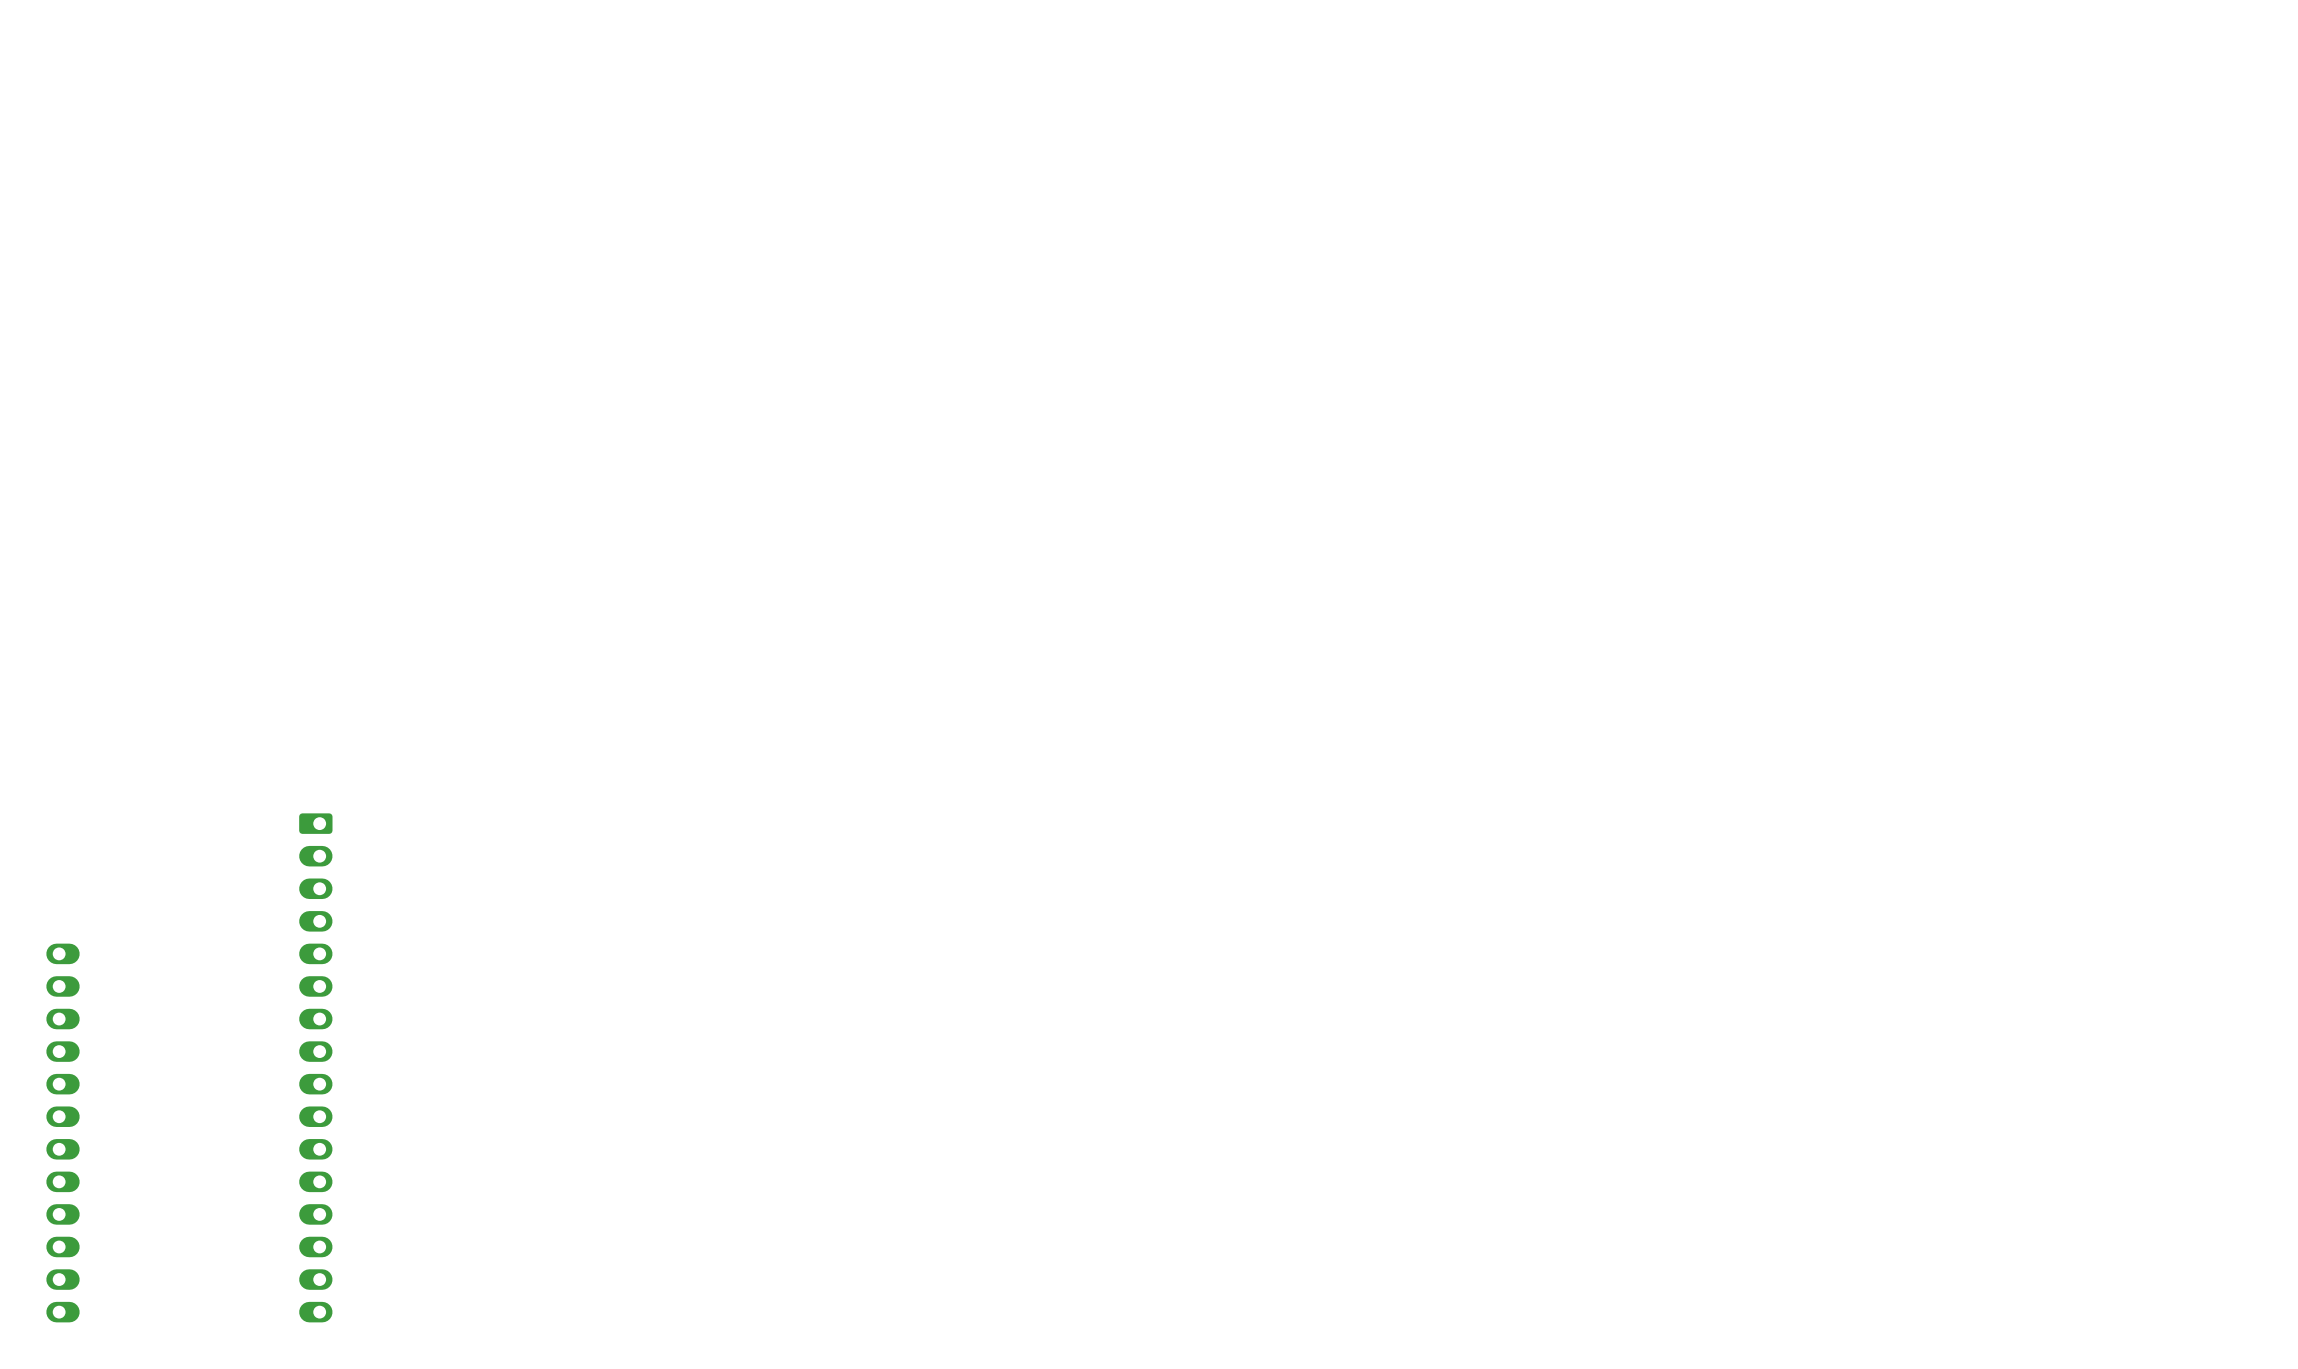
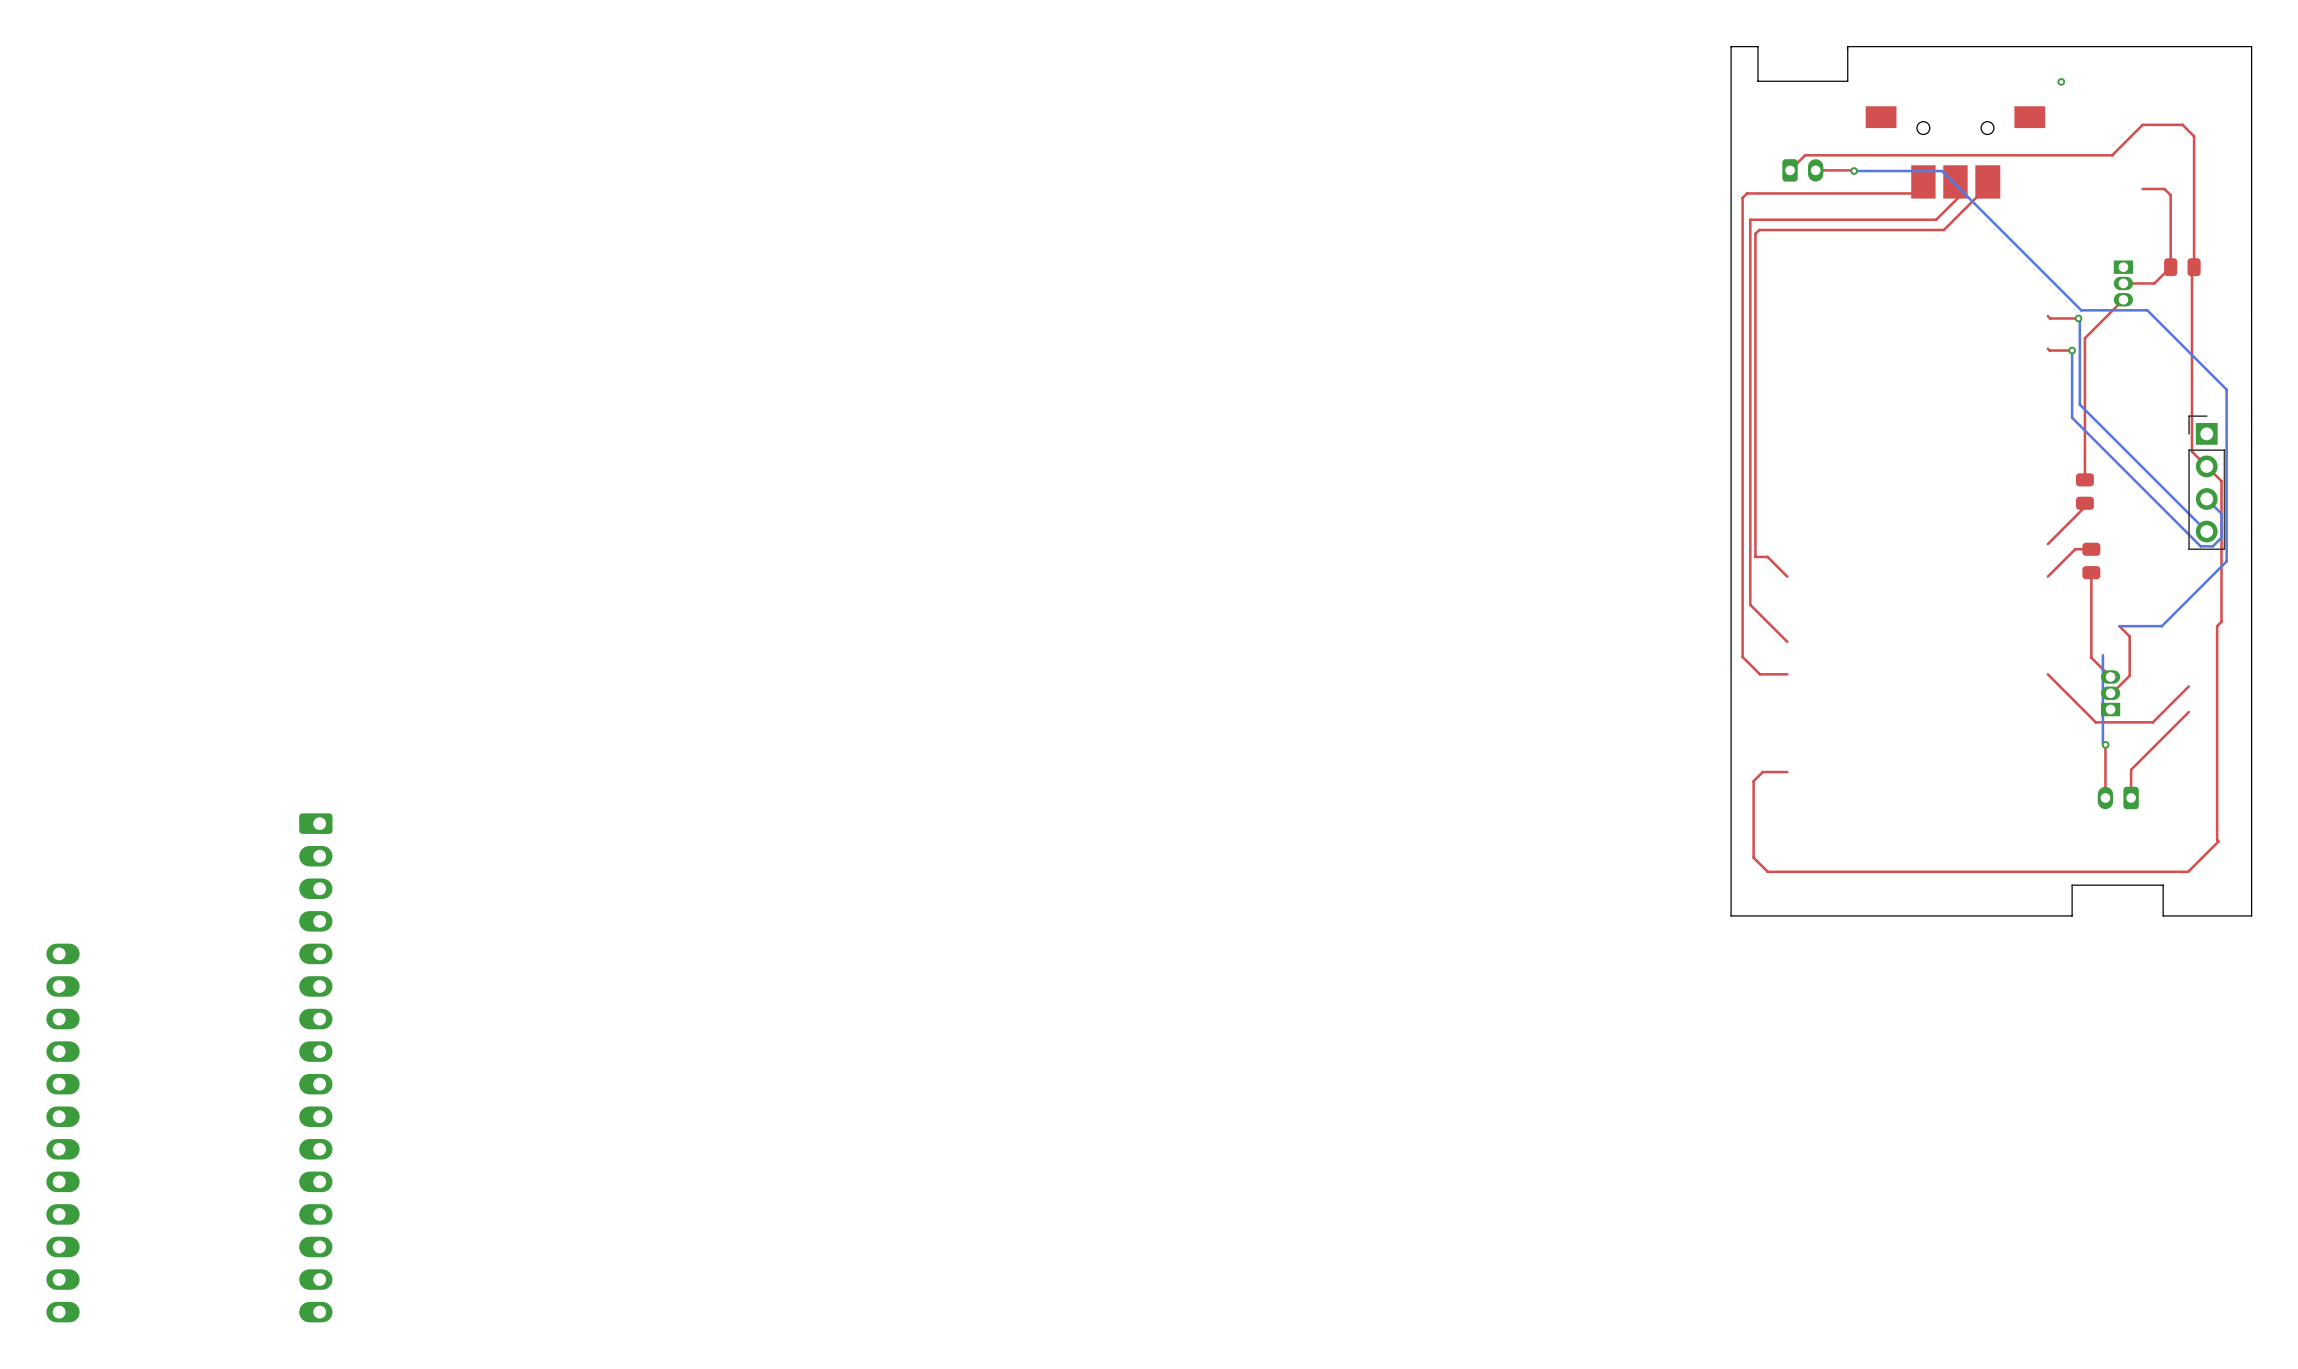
board edge: none -> (2251, 46) (2251, 915) (2163, 915) (2163, 885) (2072, 885) (2072, 915) (1731, 915) (1731, 46) (1757, 46) (1757, 81) (1847, 81) (1847, 46) (2251, 46)
via: none -> (2061, 81)
part: none -> (1955, 152)
top track: none -> (1790, 170) (1805, 155) (2112, 155) (2142, 124) (2182, 124) (2194, 136) (2191, 451) (2221, 481) (2221, 621) (2217, 626) (2218, 841) (2188, 871) (1767, 871) (1753, 857) (1753, 781) (1762, 772) (1787, 772)
part: none -> (1802, 170)
top track: none -> (1815, 170) (1854, 171)
bottom track: none -> (1854, 171) (1941, 171) (2081, 310) (2147, 310) (2226, 389) (2226, 561) (2161, 626) (2119, 626)
via: none -> (1854, 171)
top track: none -> (1987, 181) (1987, 186) (1943, 230) (1759, 230) (1755, 233) (1755, 556) (1767, 556) (1787, 576)
top track: none -> (2142, 188) (2164, 188) (2170, 195) (2170, 267) (2154, 283) (2123, 283)
top track: none -> (1925, 193) (1747, 193) (1742, 197) (1742, 656) (1760, 674) (1787, 674)
top track: none -> (1958, 193) (1958, 197) (1936, 219) (1750, 219) (1750, 604) (1787, 641)
part: none -> (2182, 267)
part: none -> (2123, 283)
top track: none -> (2123, 299) (2084, 338) (2084, 479)
top track: none -> (2047, 316) (2050, 318) (2078, 318)
bottom track: none -> (2078, 318) (2079, 404) (2206, 531)
via: none -> (2078, 318)
top track: none -> (2047, 348) (2049, 350) (2072, 350)
bottom track: none -> (2072, 350) (2072, 417) (2200, 546) (2212, 546) (2221, 537) (2221, 513) (2206, 498)
via: none -> (2072, 350)
part: none -> (2206, 482)
part: none -> (2084, 491)
top track: none -> (2084, 503) (2084, 506) (2047, 544)
top track: none -> (2091, 549) (2075, 549) (2047, 576)
part: none -> (2091, 560)
top track: none -> (2091, 572) (2091, 657) (2110, 676)
top track: none -> (2119, 626) (2129, 636) (2129, 675) (2110, 693)
bottom track: none -> (2102, 655) (2102, 742) (2105, 744)
top track: none -> (2047, 674) (2095, 722) (2152, 722) (2188, 686)
part: none -> (2110, 693)
top track: none -> (2188, 712) (2131, 769) (2131, 797)
via: none -> (2105, 744)
top track: none -> (2105, 745) (2105, 797)
part: none -> (2118, 797)

